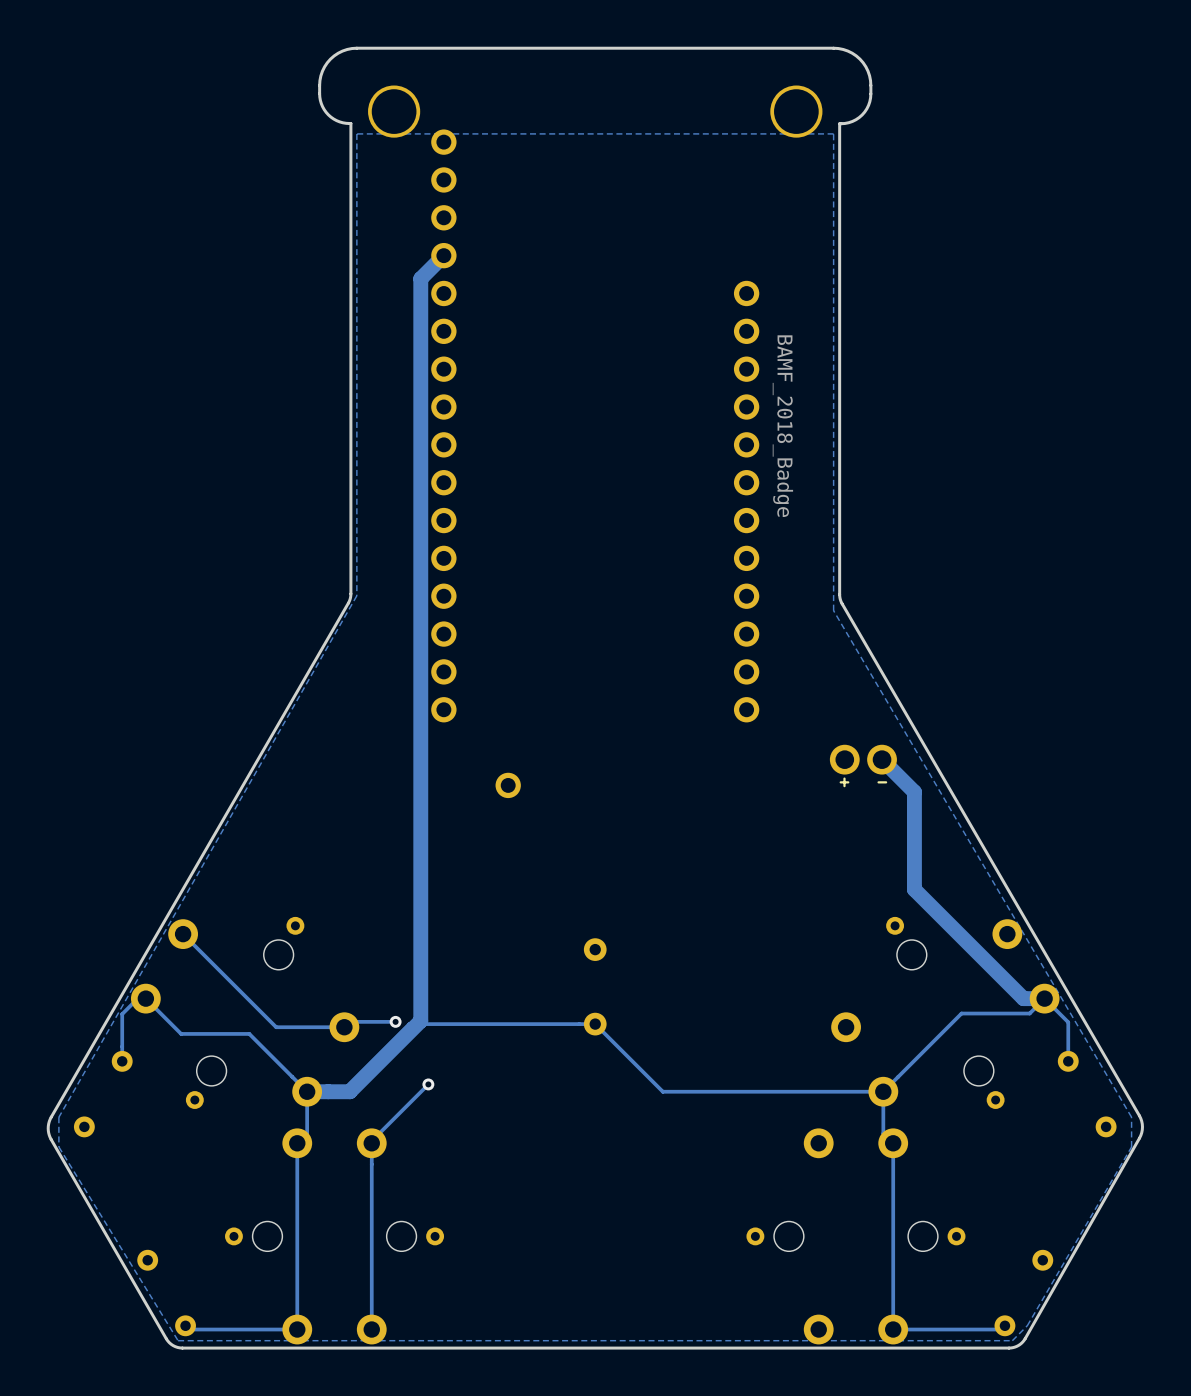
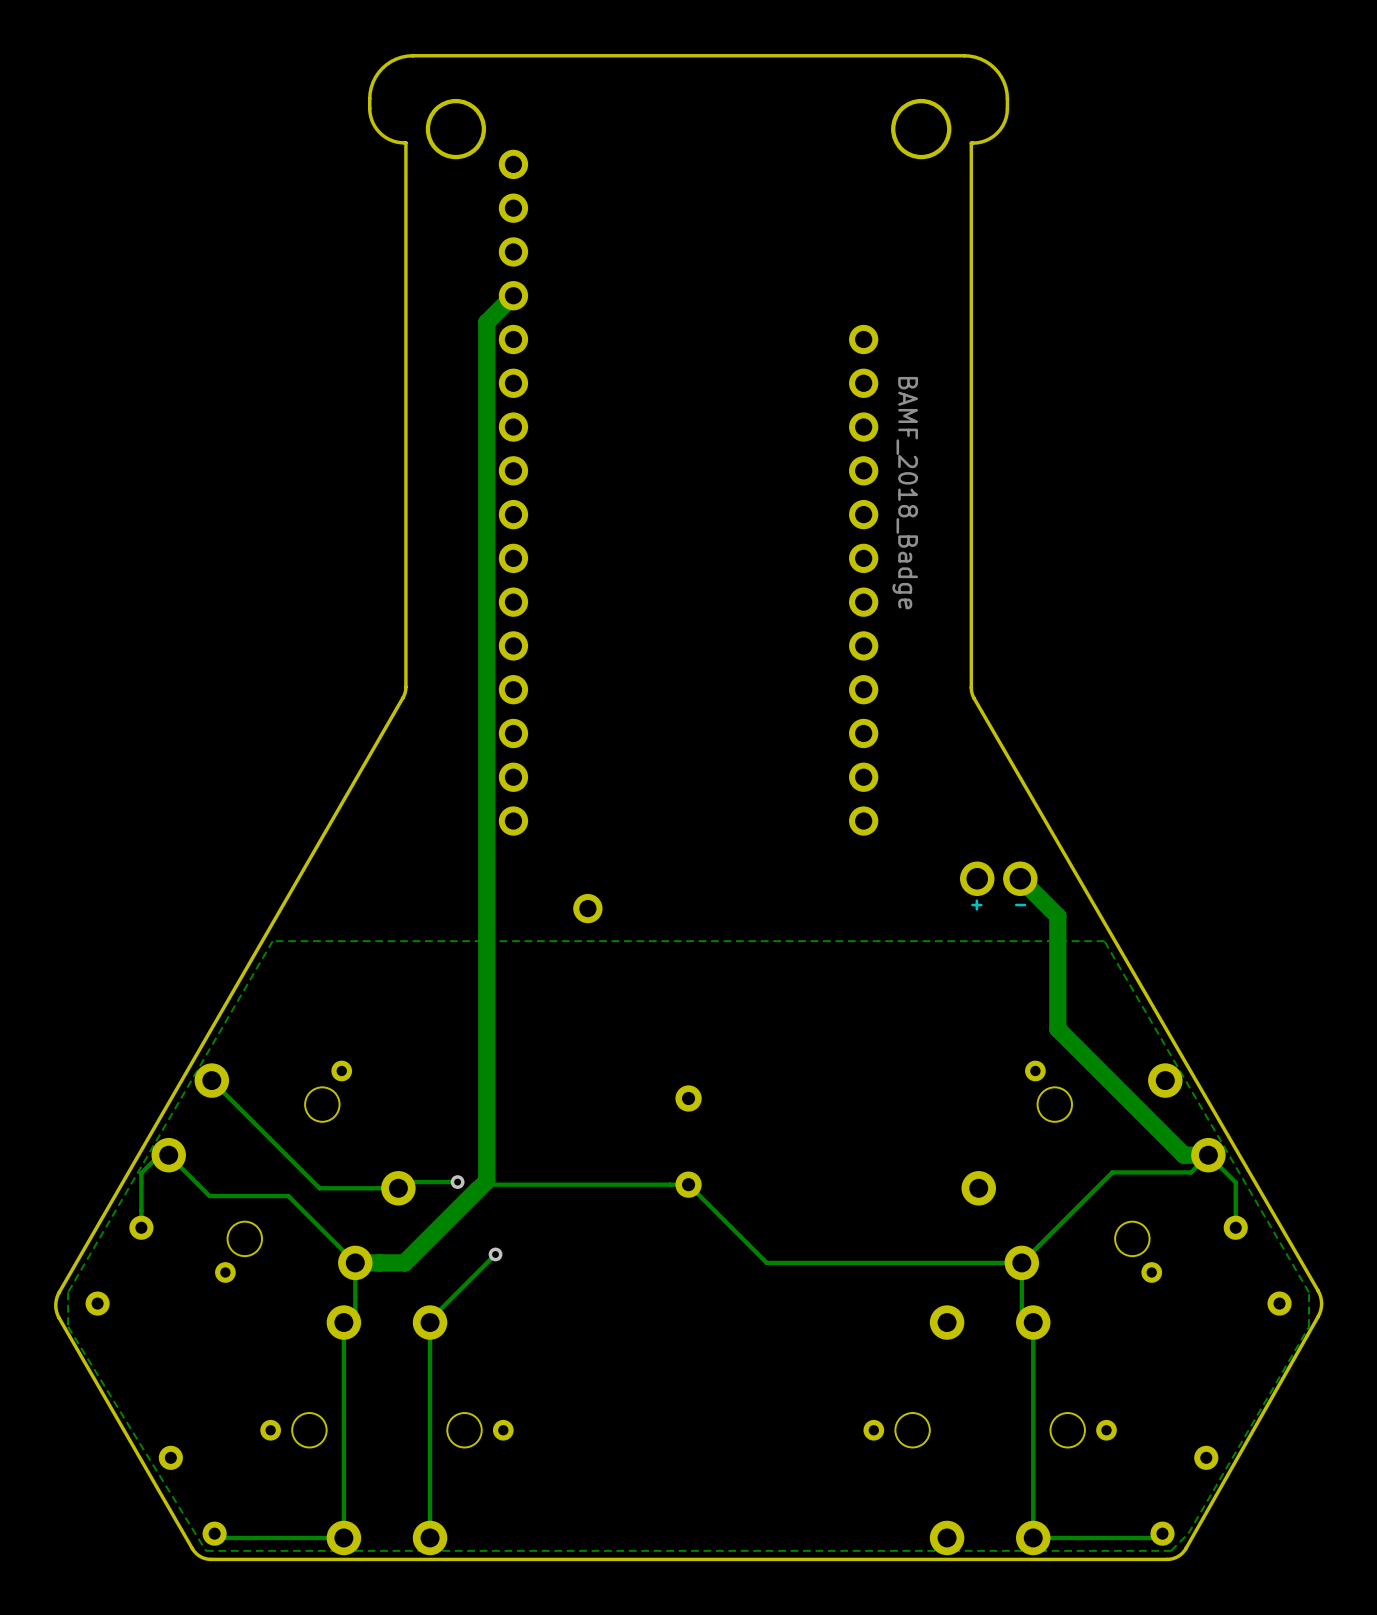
zone outline: (1131, 1117) (833, 610) (833, 133) (356, 133) (356, 595) (58, 1117) -> (1308, 1292) (1104, 941) (272, 941) (68, 1292)

